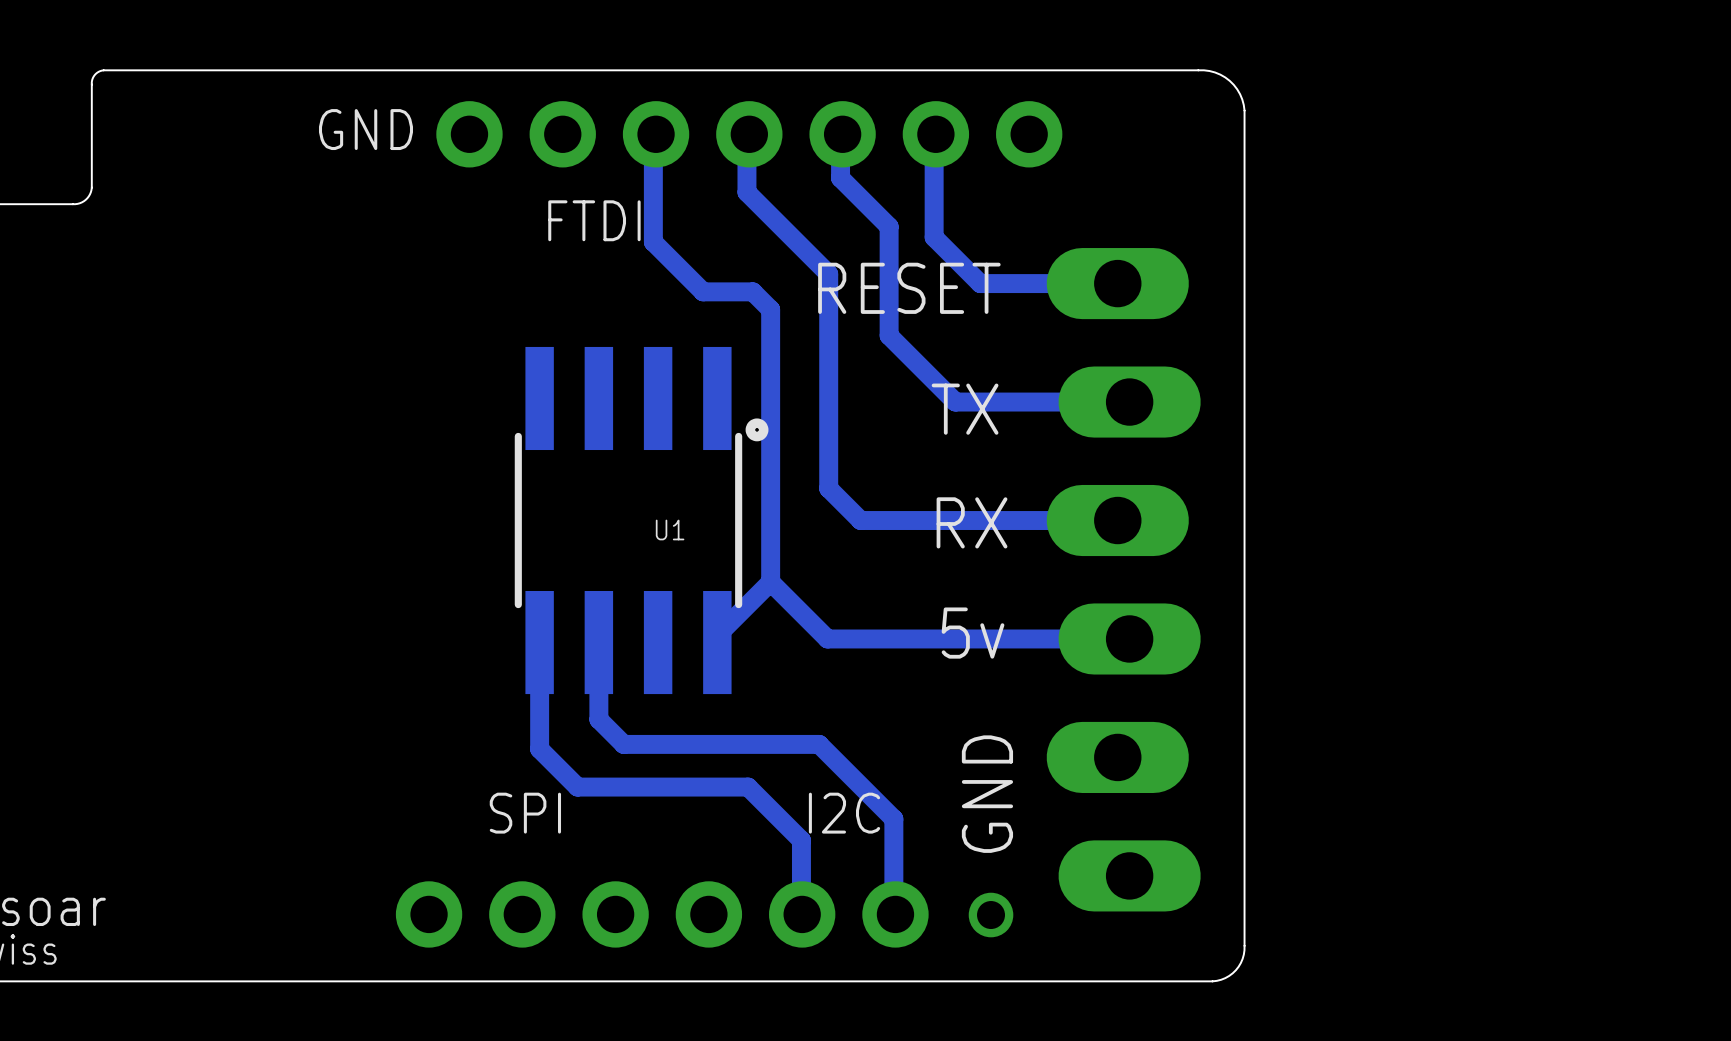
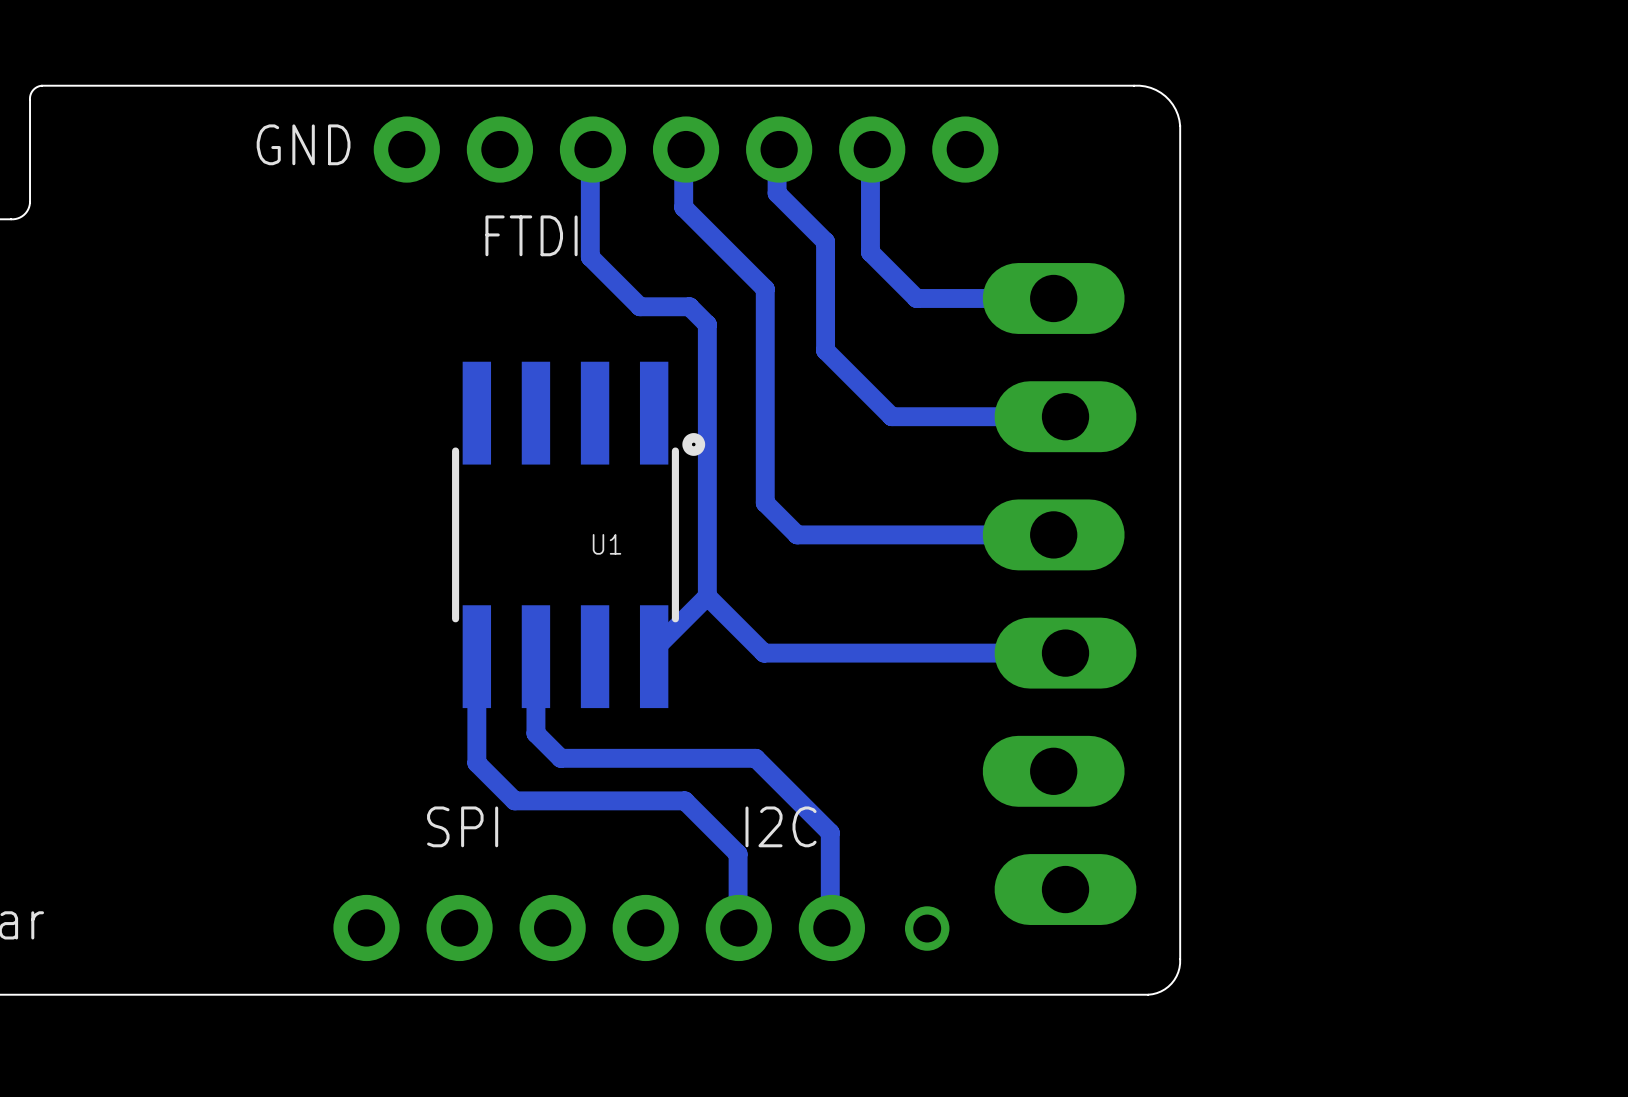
text: RESET (909, 288) -> none
text: TX (965, 409) -> none
text: RX (972, 522) -> none
text: 5v (973, 633) -> none
text: GND (987, 794) -> none

